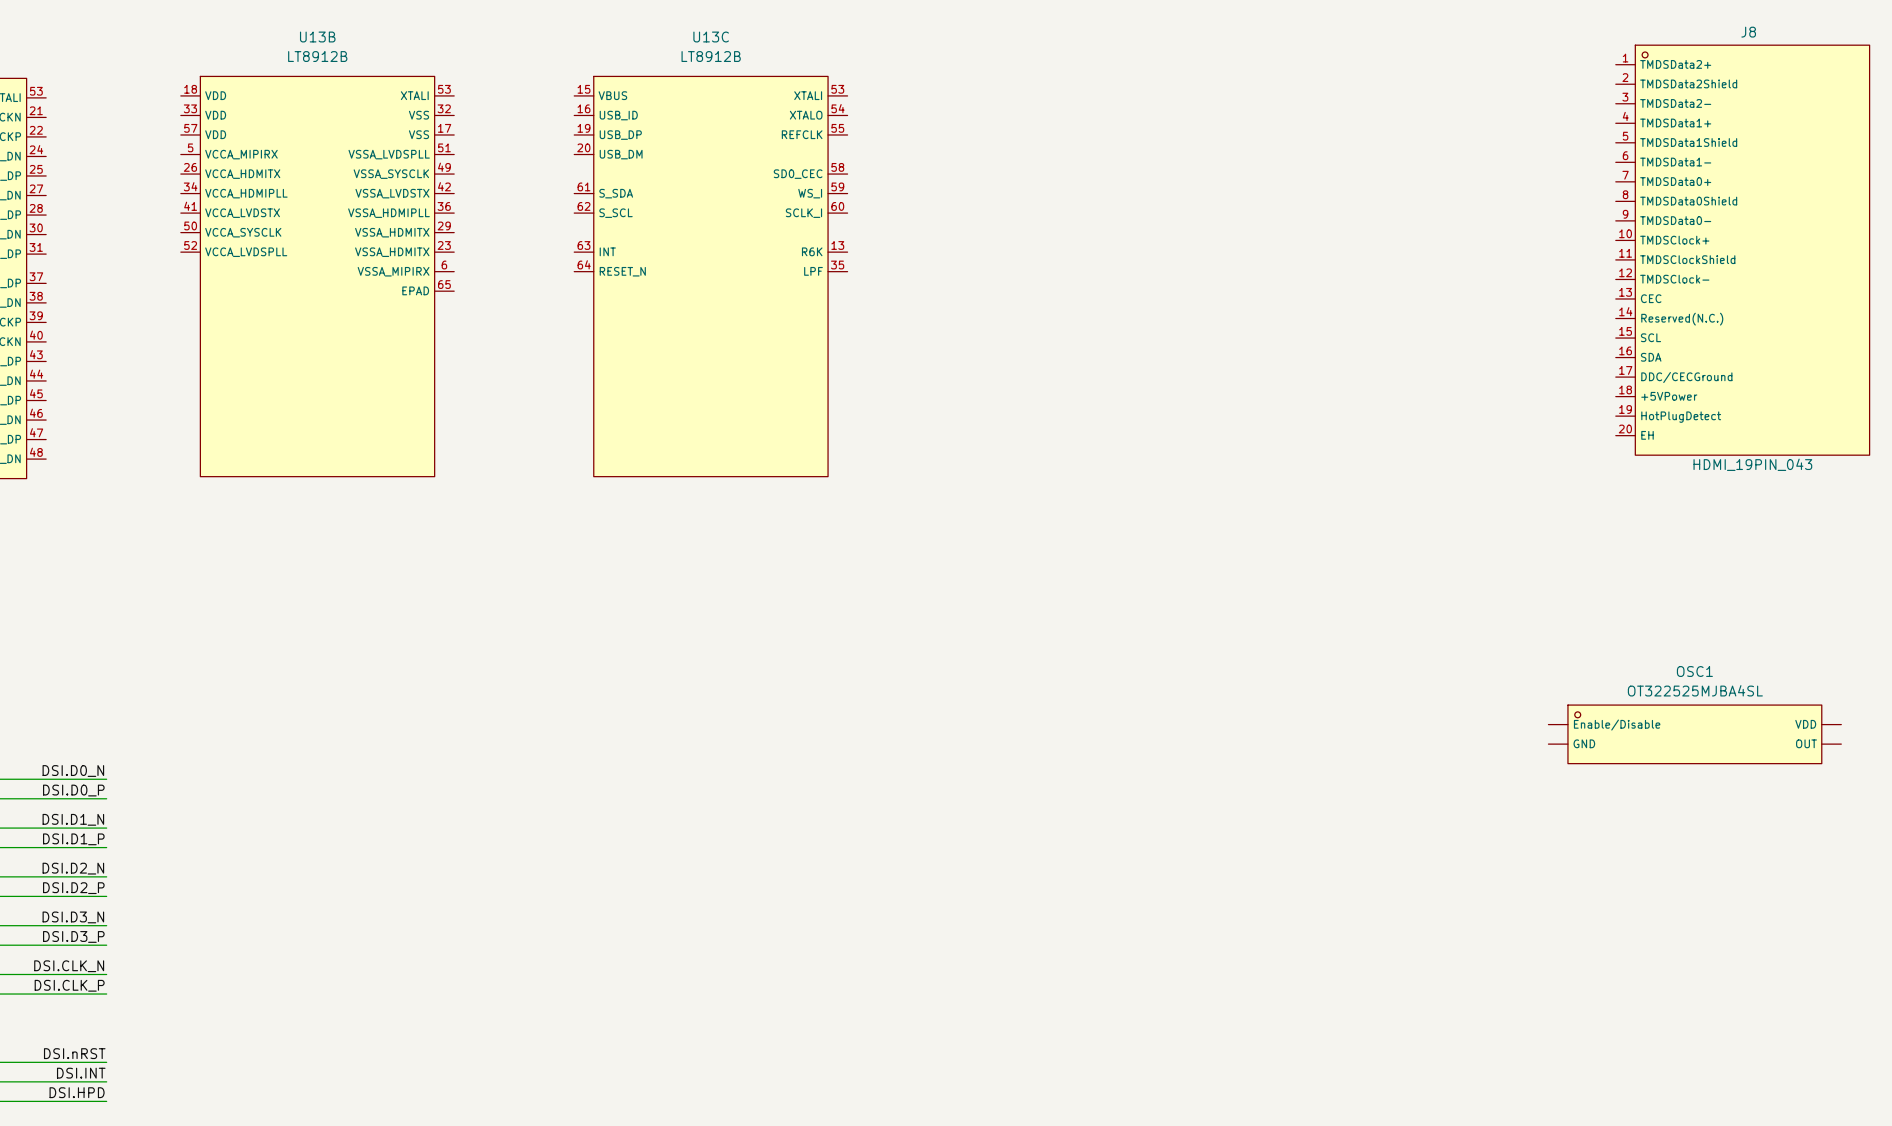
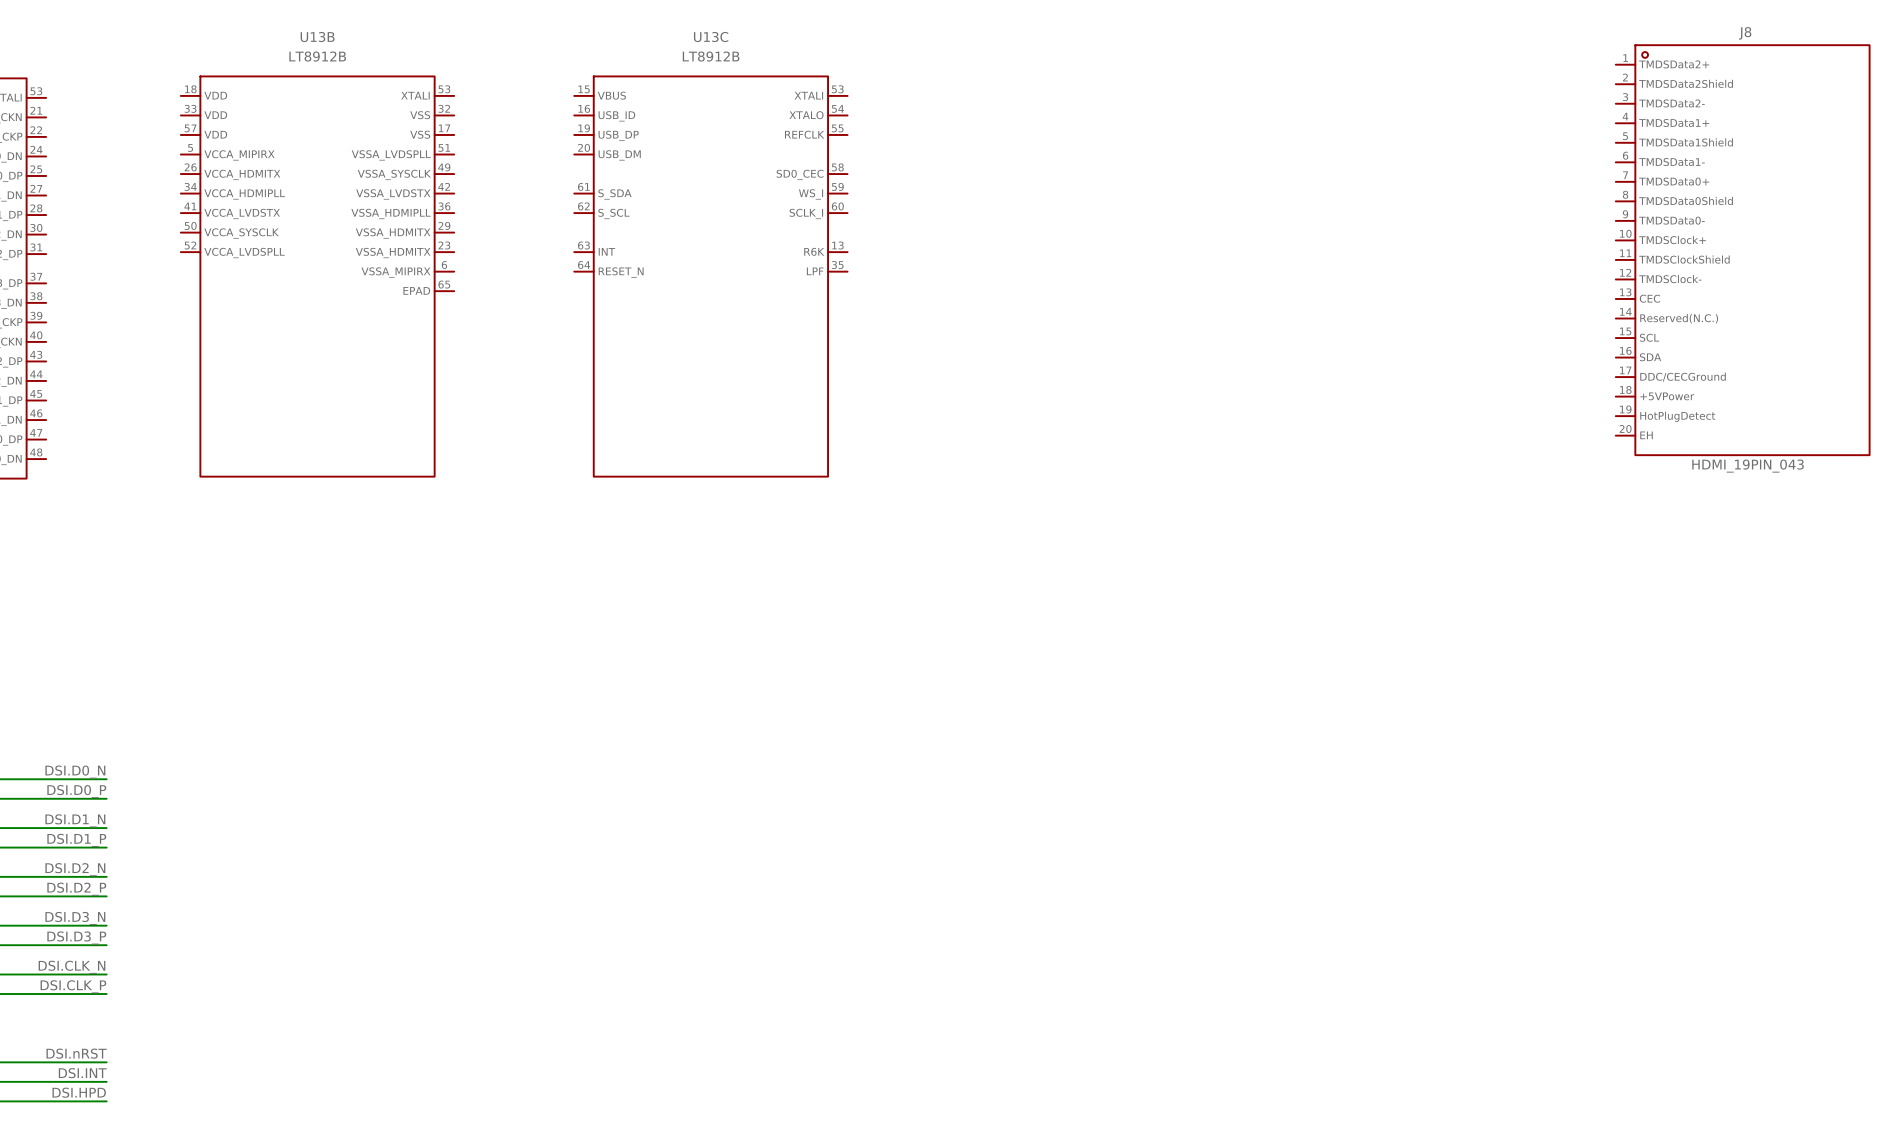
OSC1: OT322525MJBA4SL (1694, 734) -> none

